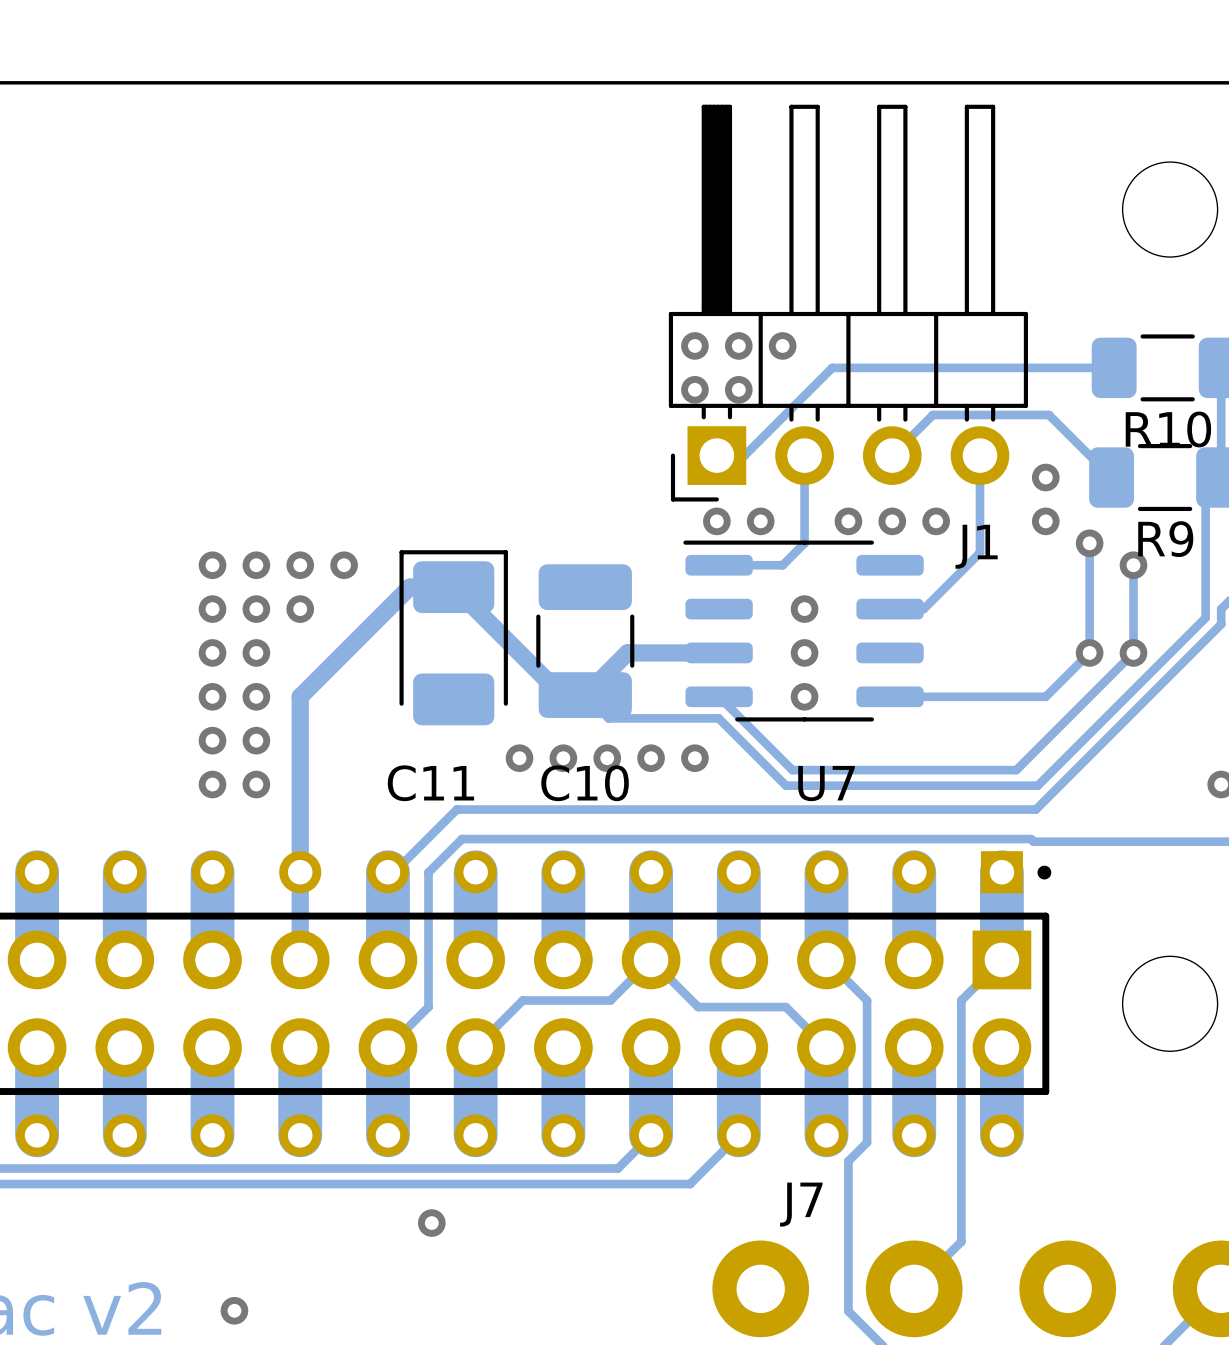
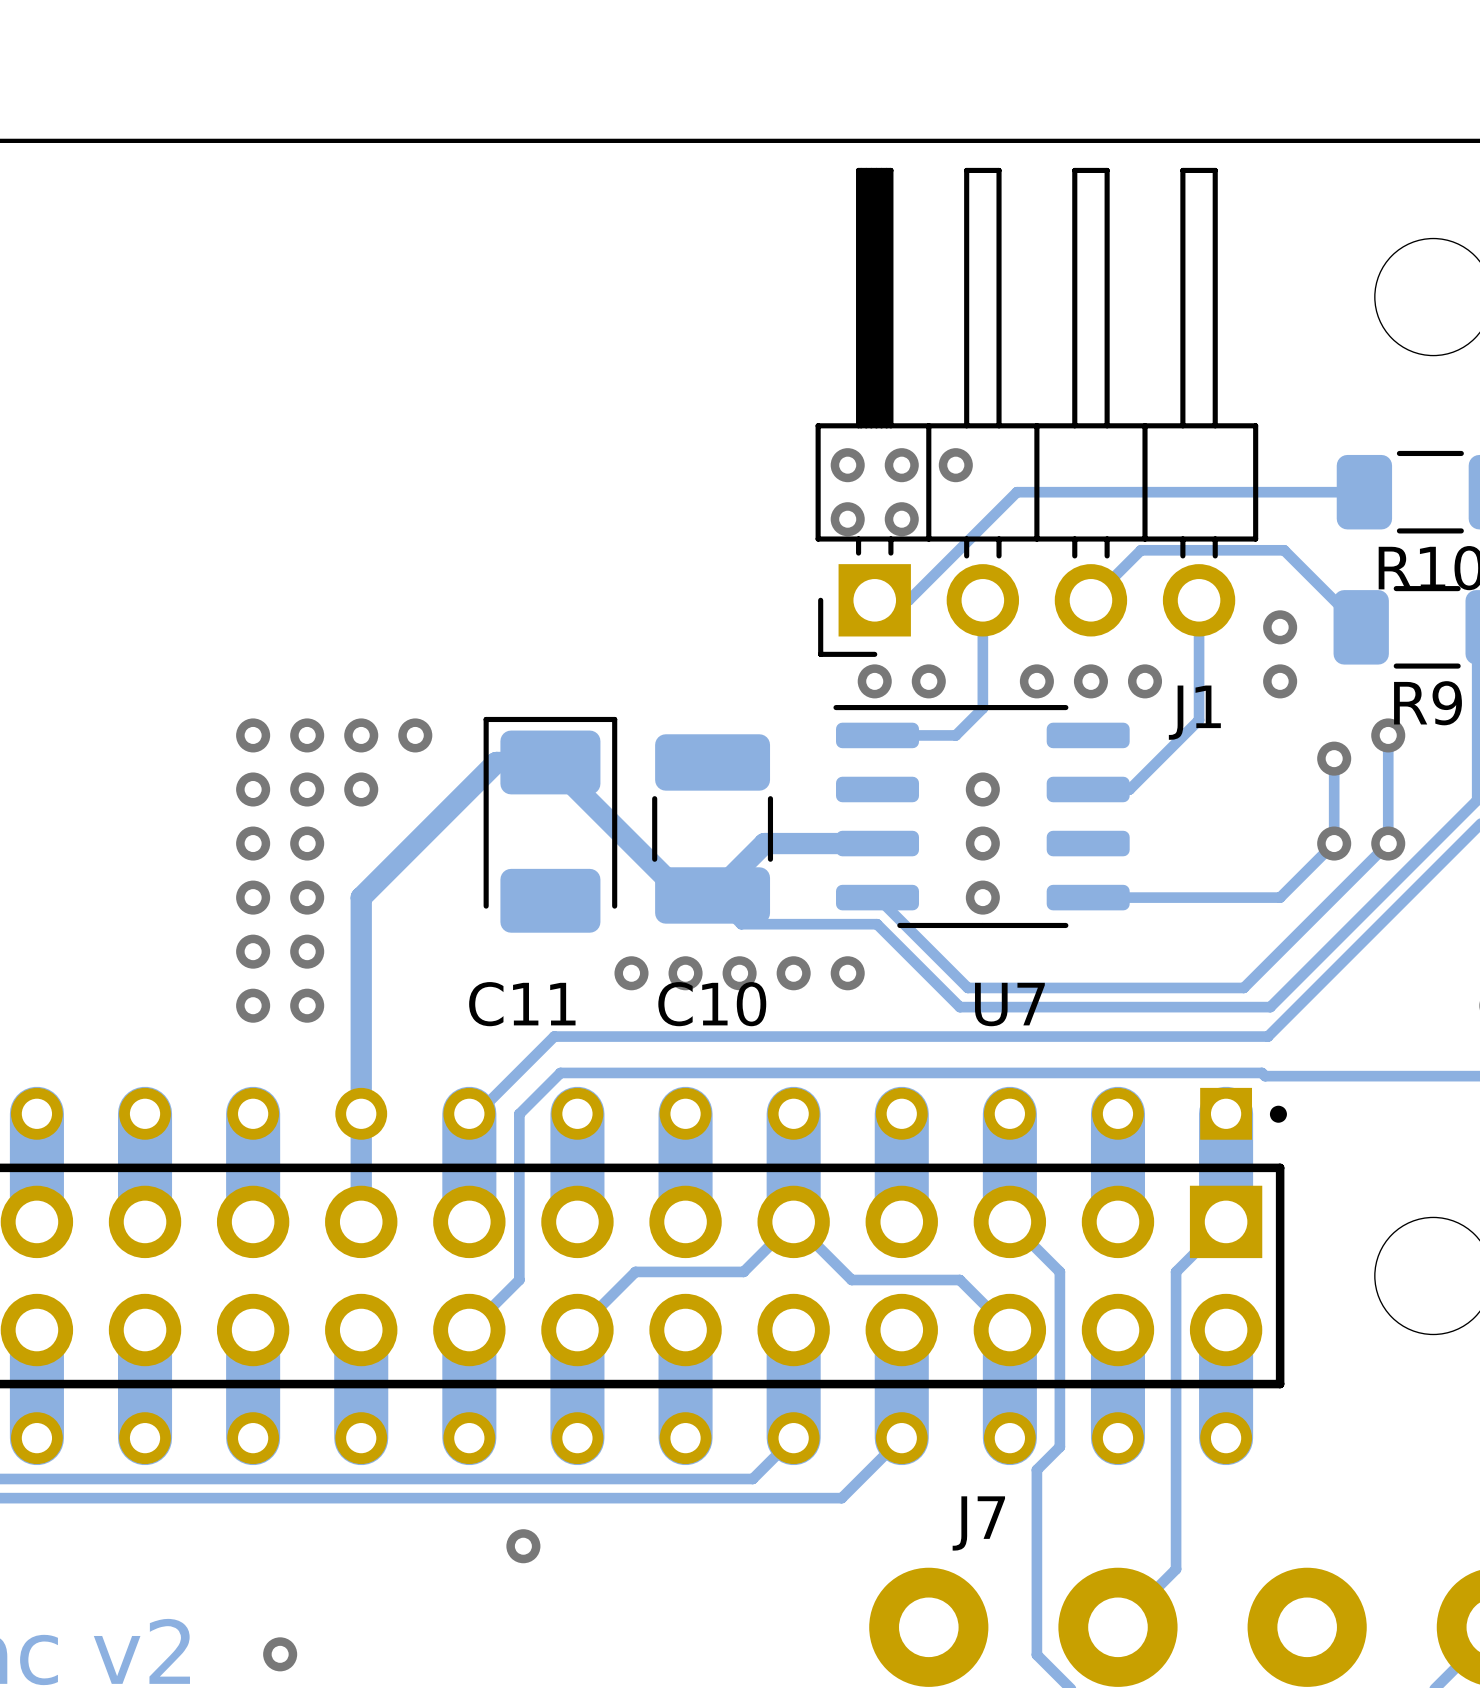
track: (1089, 543) (1089, 584) -> none
via position: (1089, 543) -> (1334, 758)

